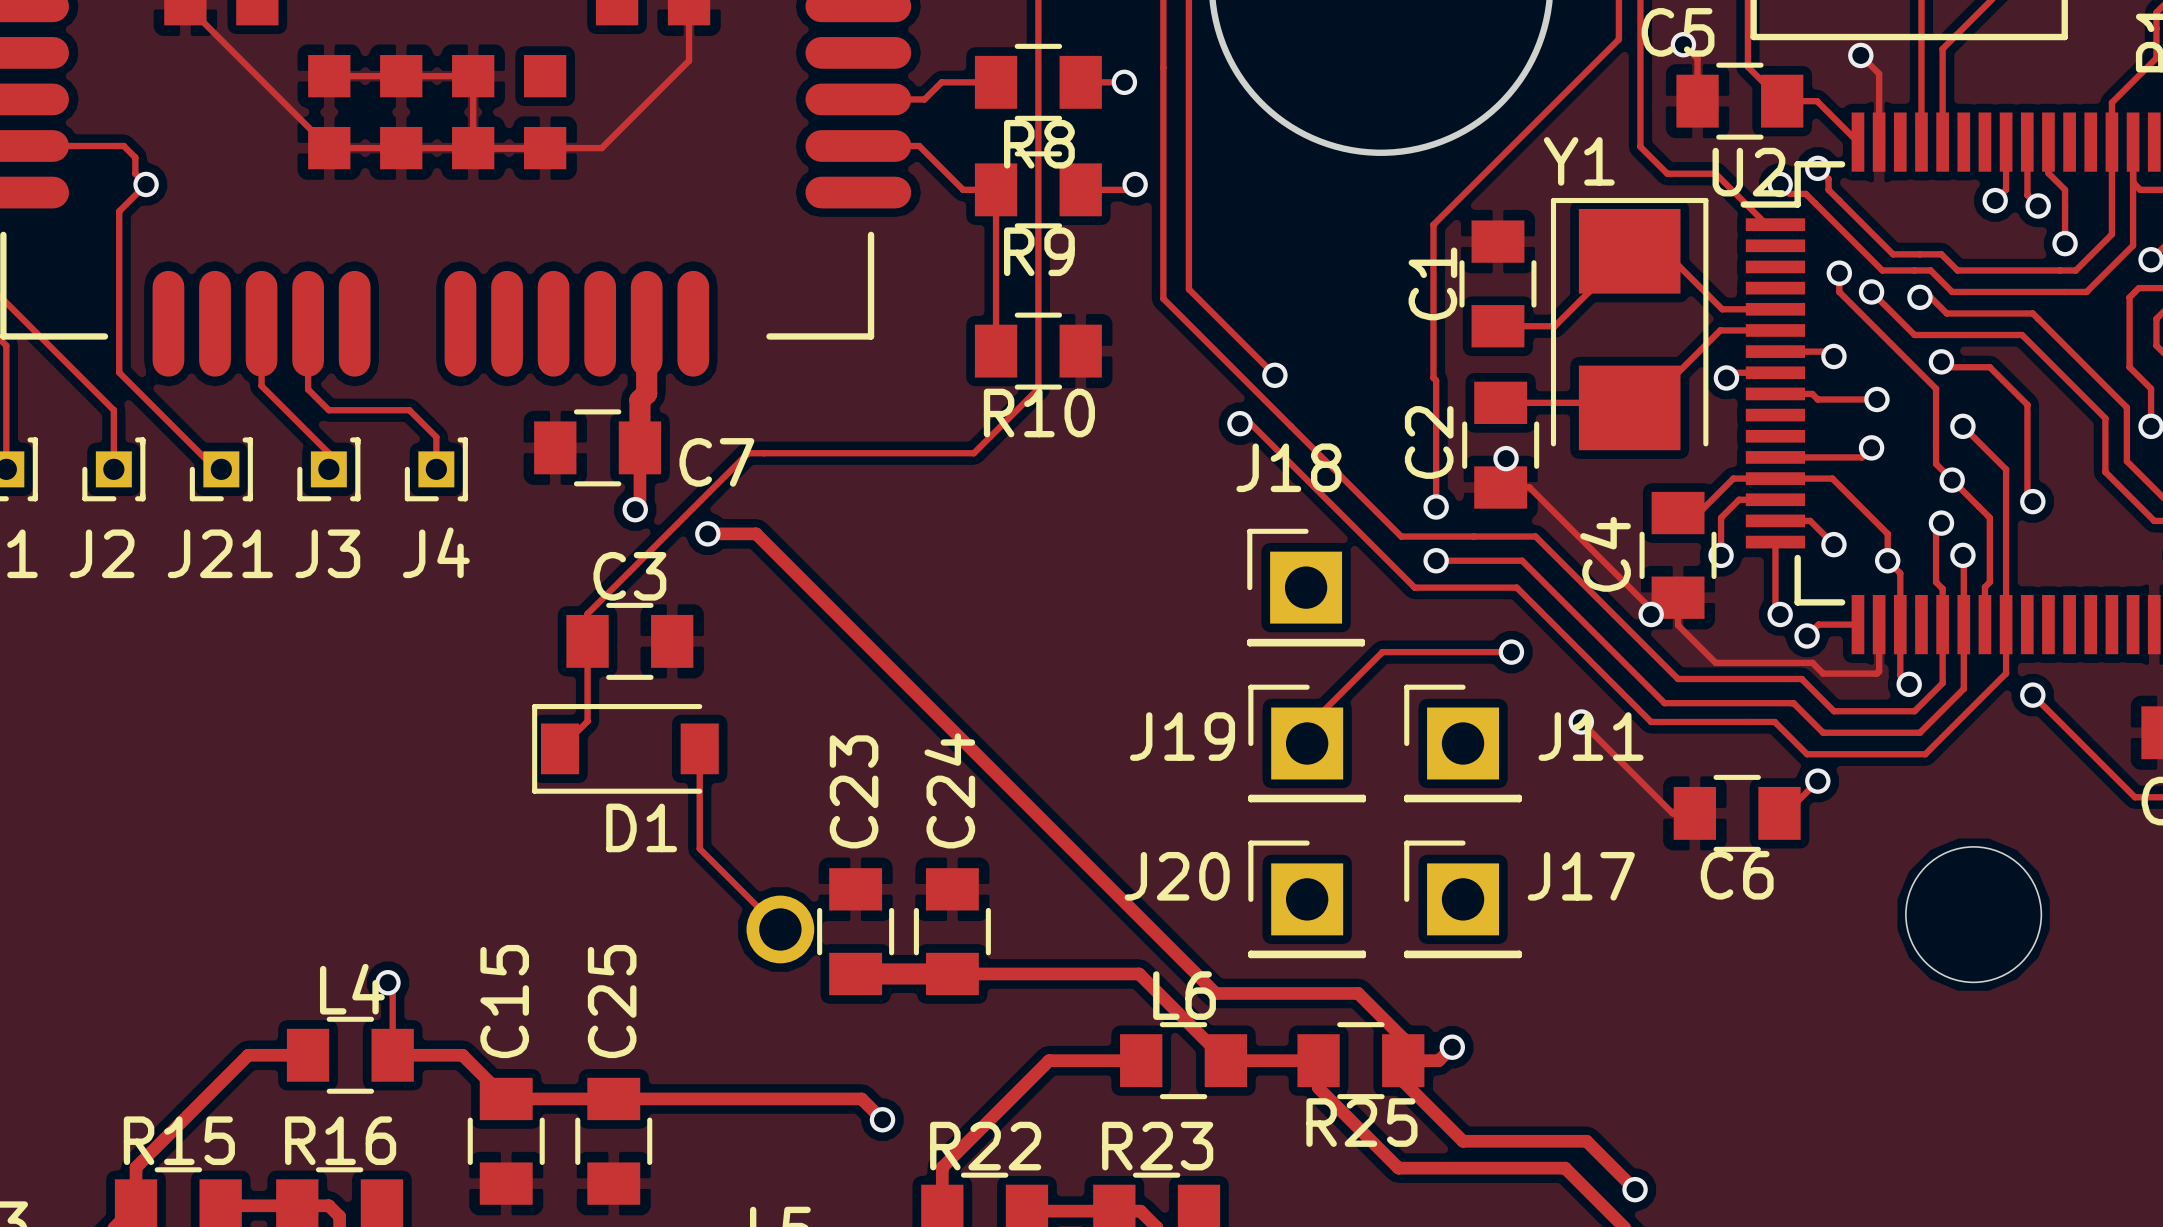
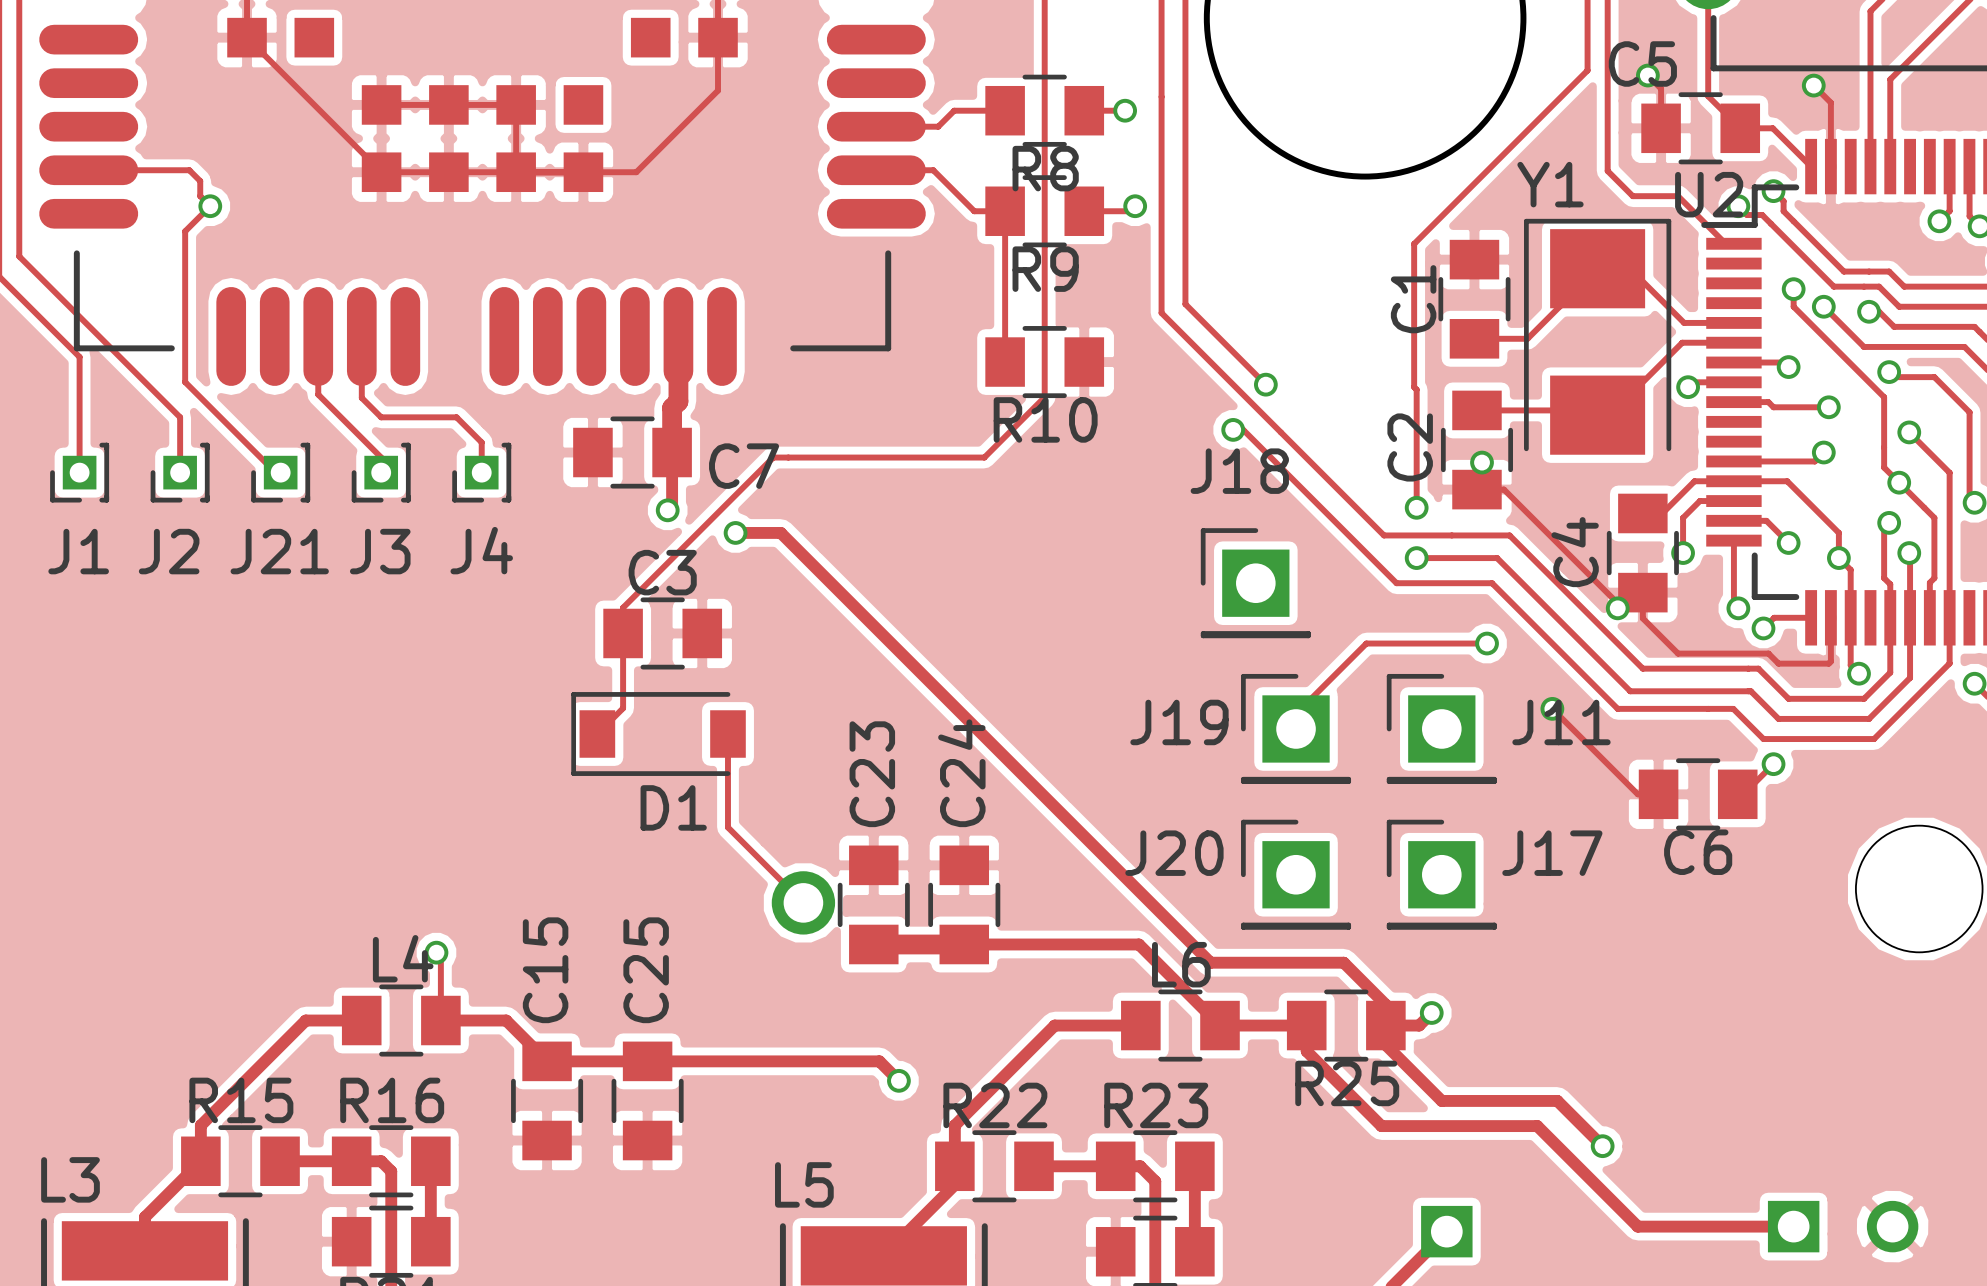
J18 position: (1306, 587) -> (1255, 583)

